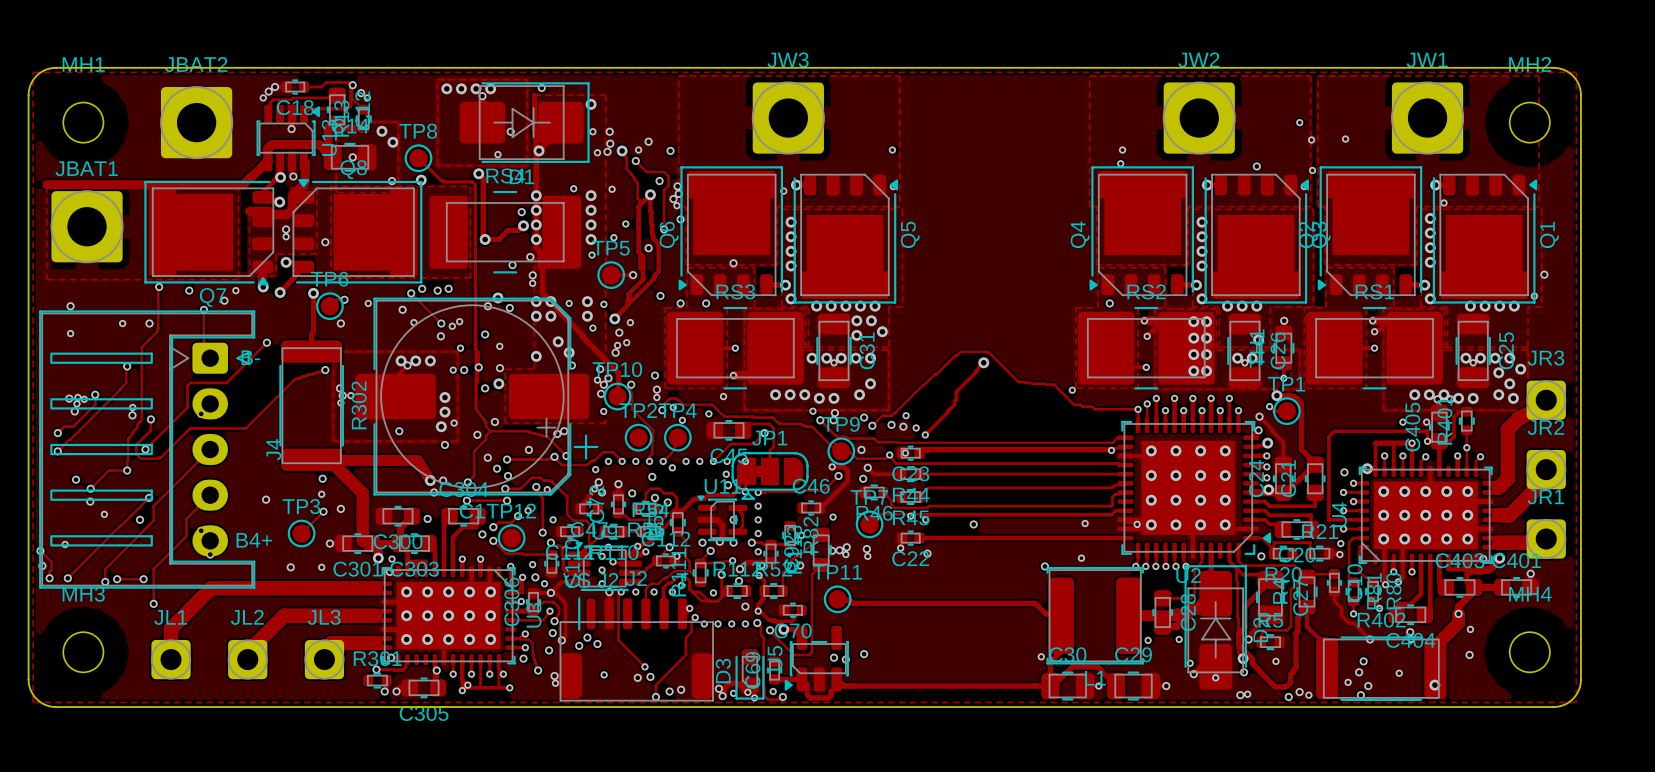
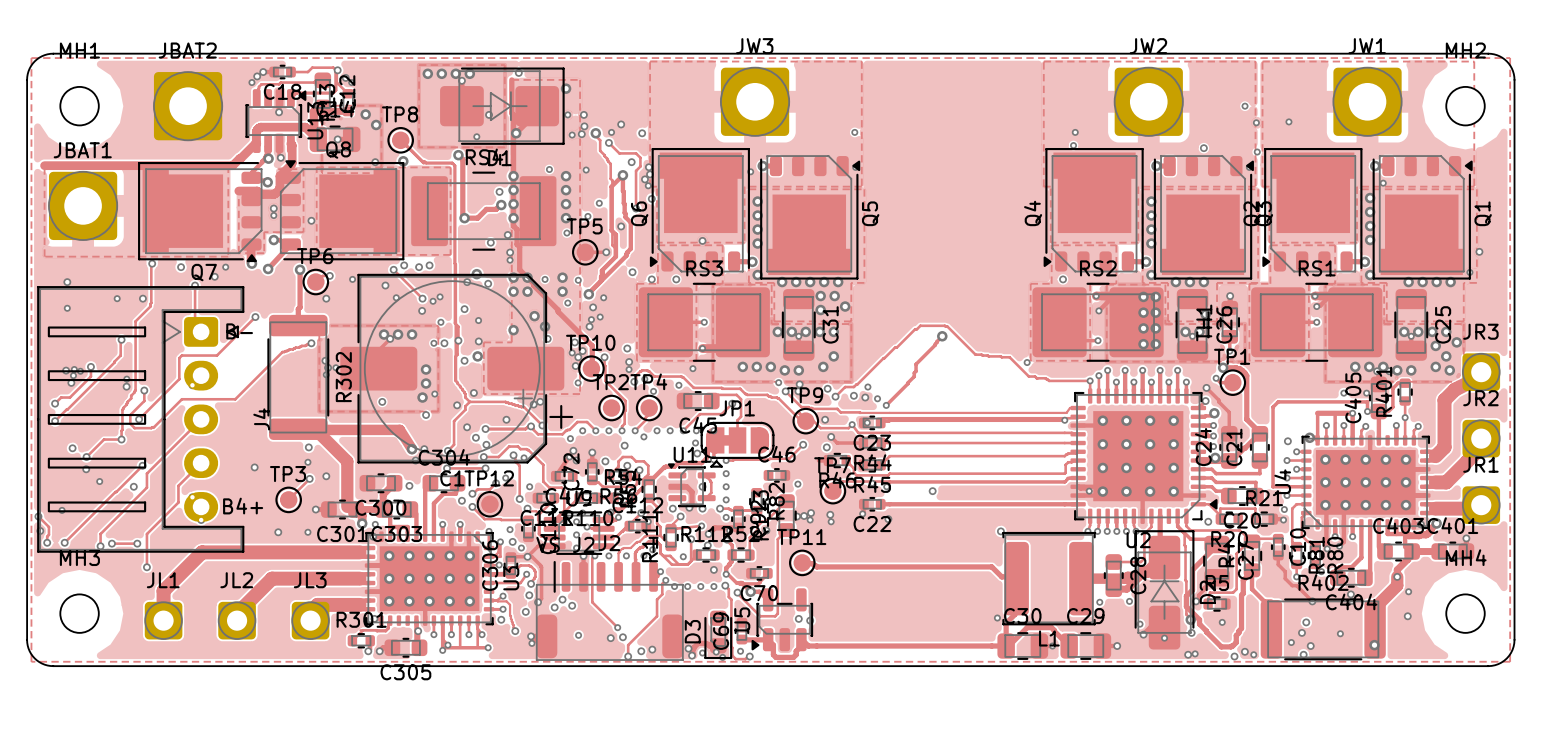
track: (832, 466) (844, 466) (847, 470) (847, 481) (819, 507) -> none
via: (832, 466) -> none
via: (1085, 523) -> none
via: (1081, 558) -> none
via: (864, 654) -> none
via: (376, 669) -> none

